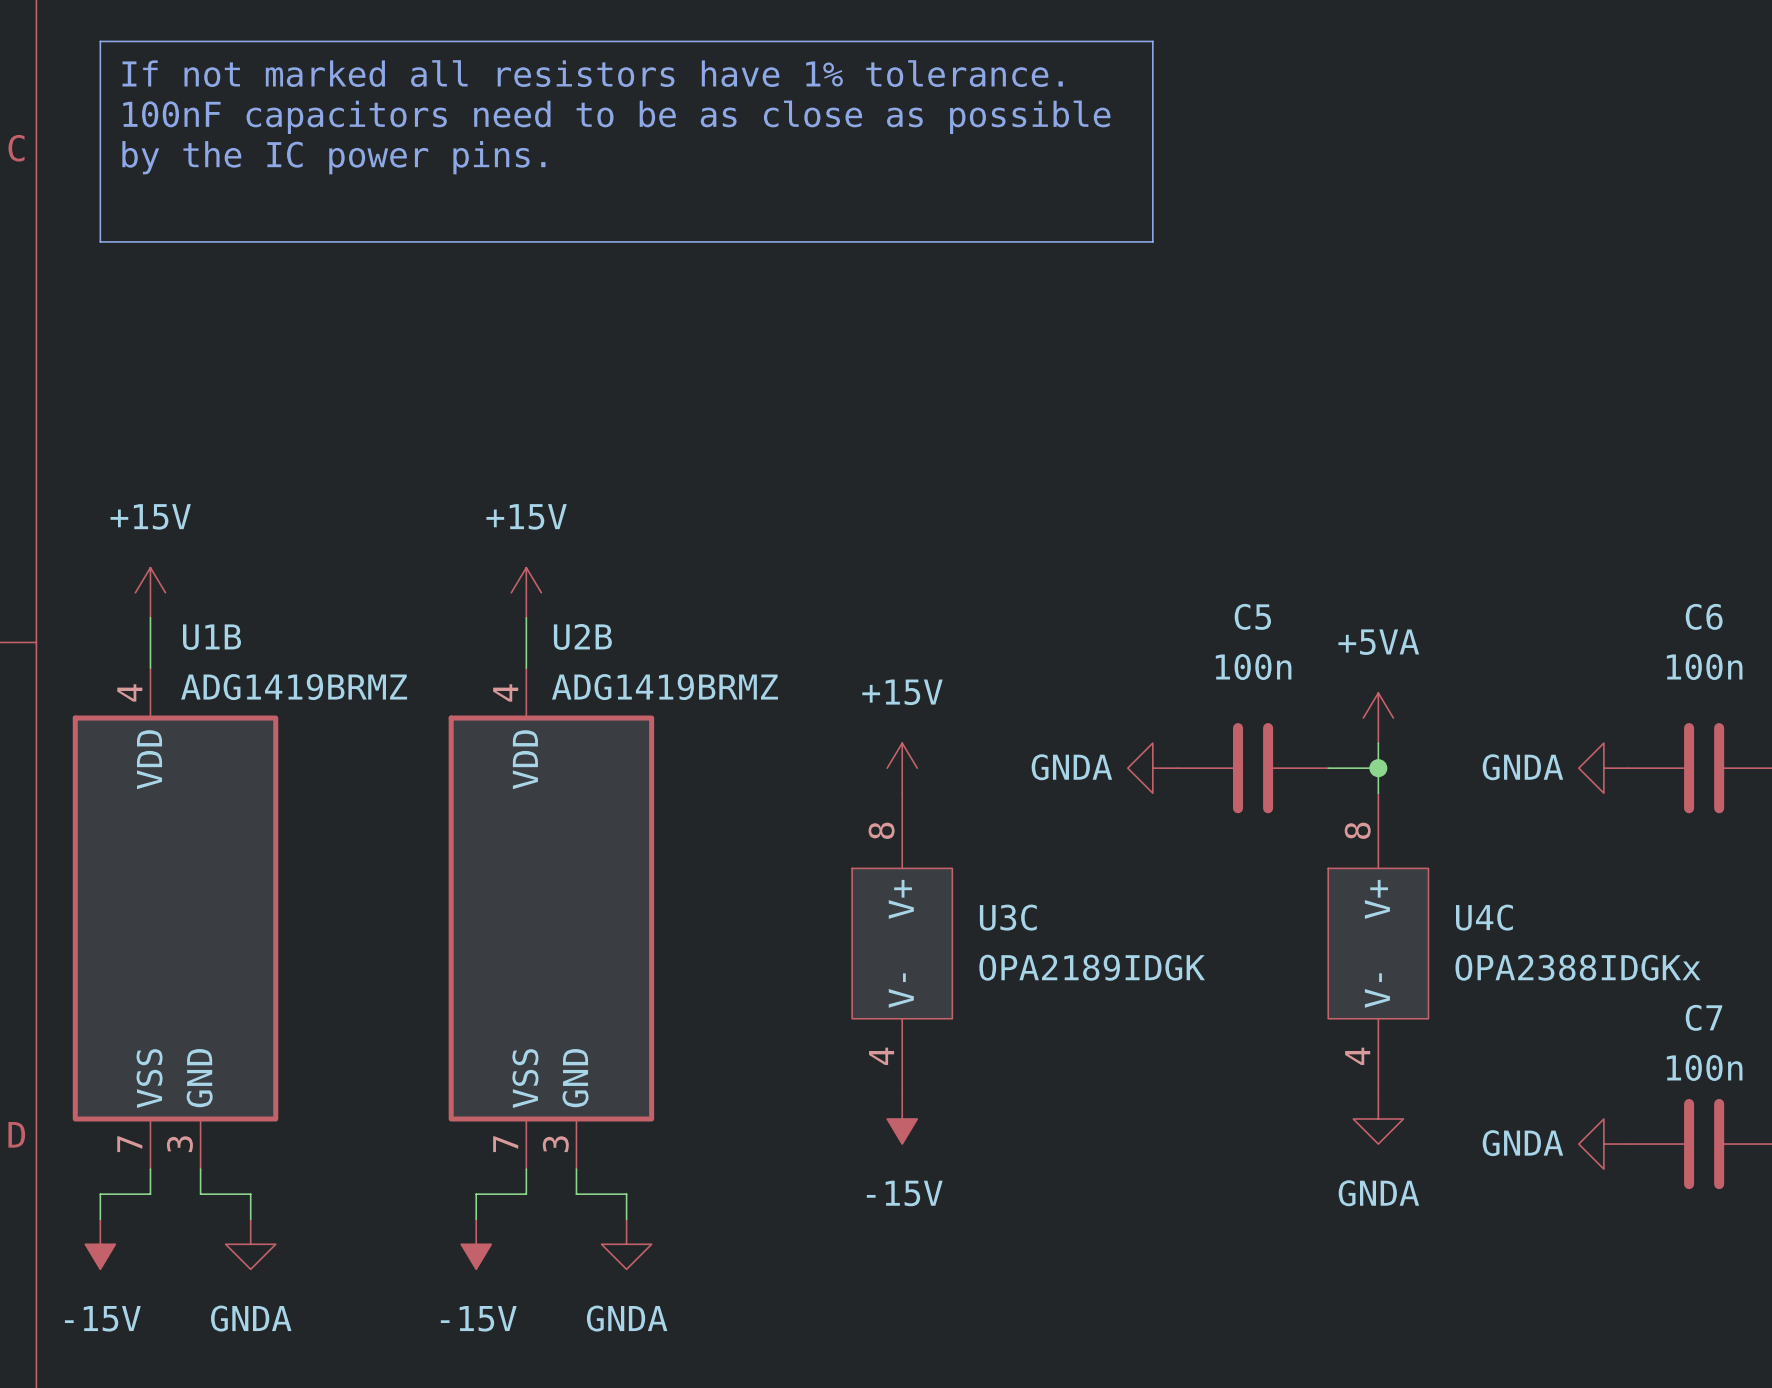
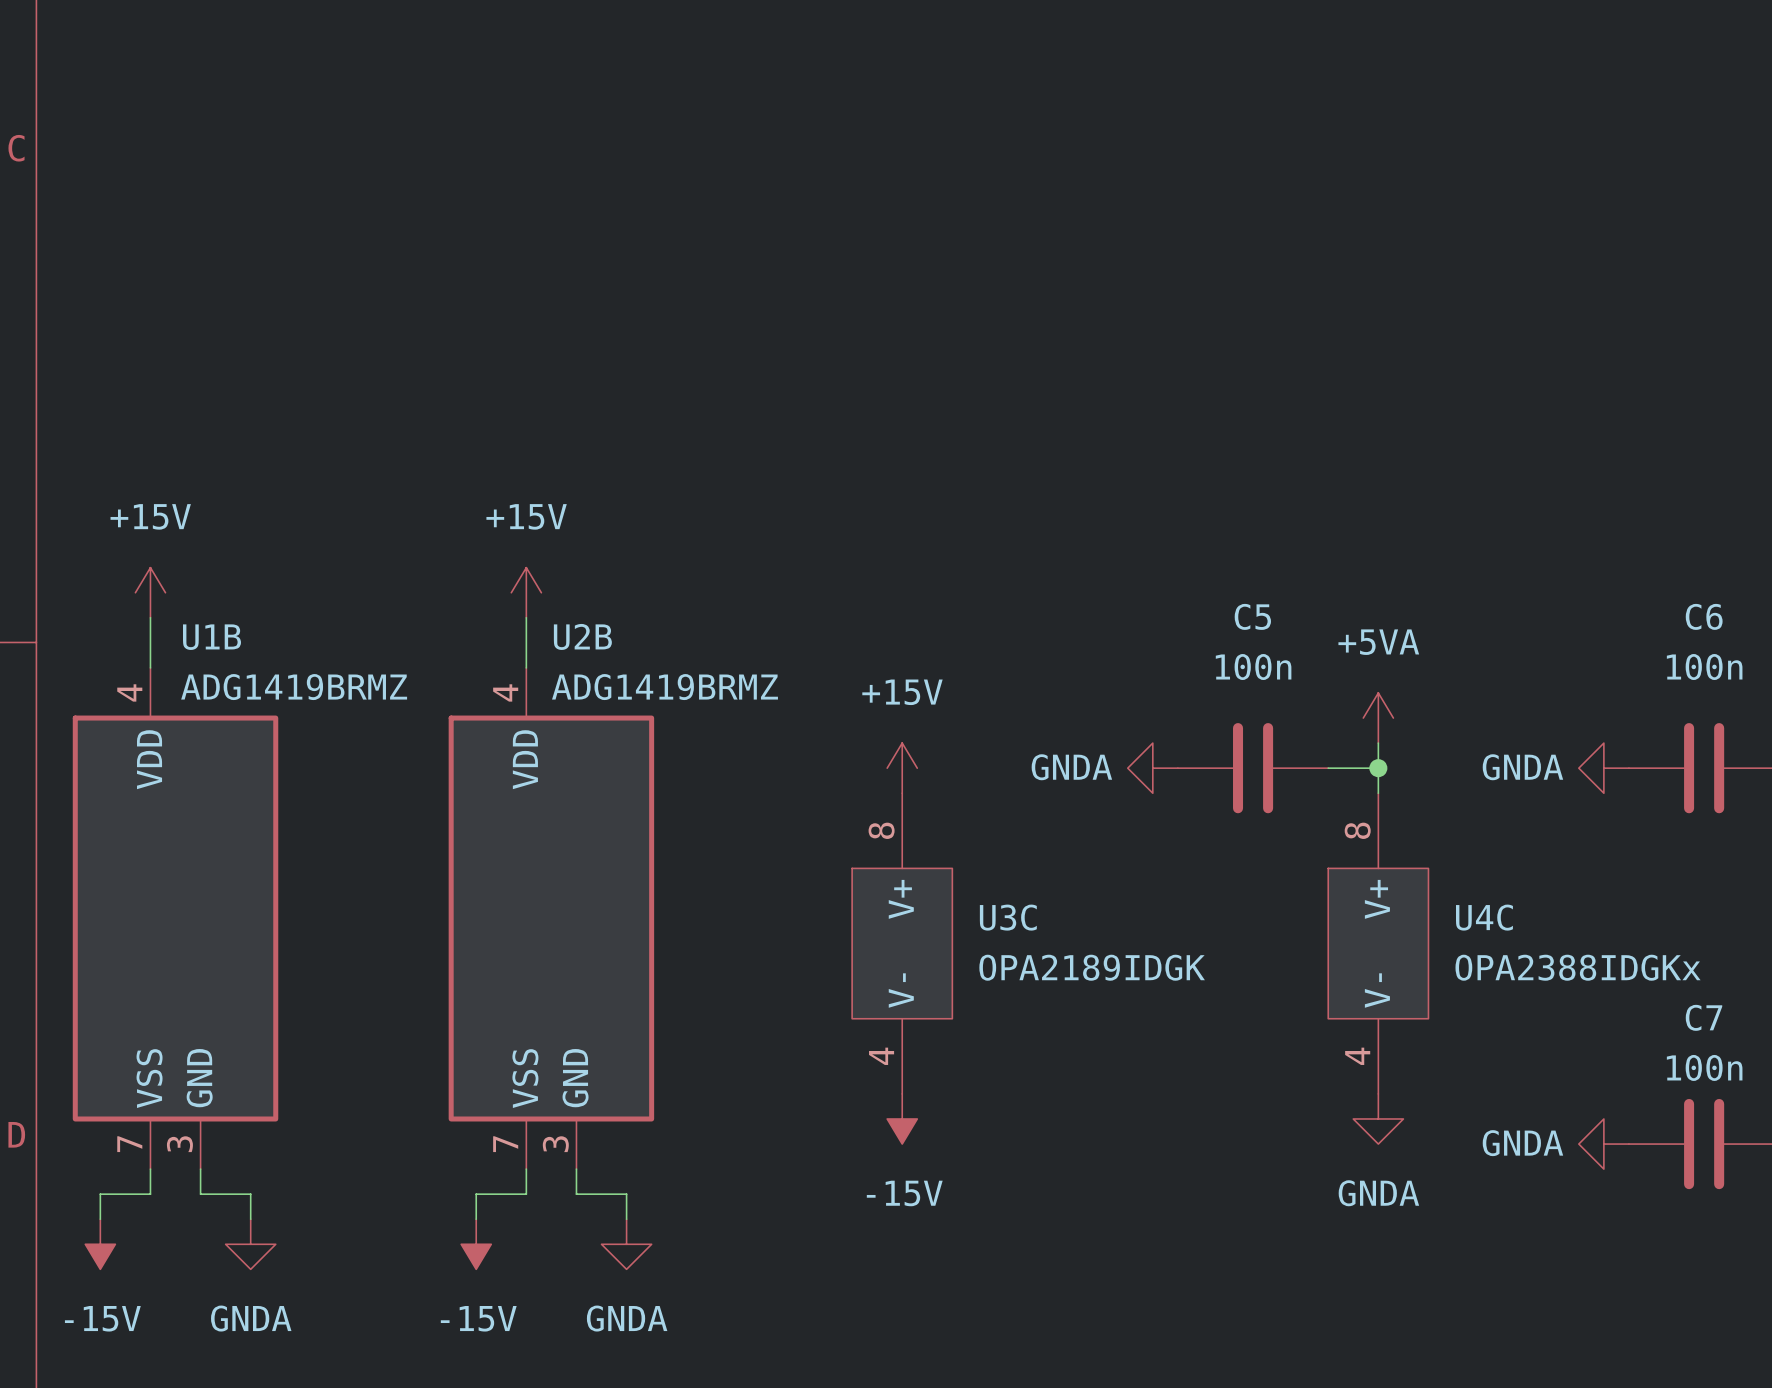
line: (100, 41) (1152, 41) (1152, 241) (100, 241) (100, 41) -> none
text: If not marked all resistors have 1% tolerance. (592, 73) -> none
text: 100nF capacitors need to be as close as possible (616, 117) -> none
text: by the IC power pins. (333, 157) -> none

